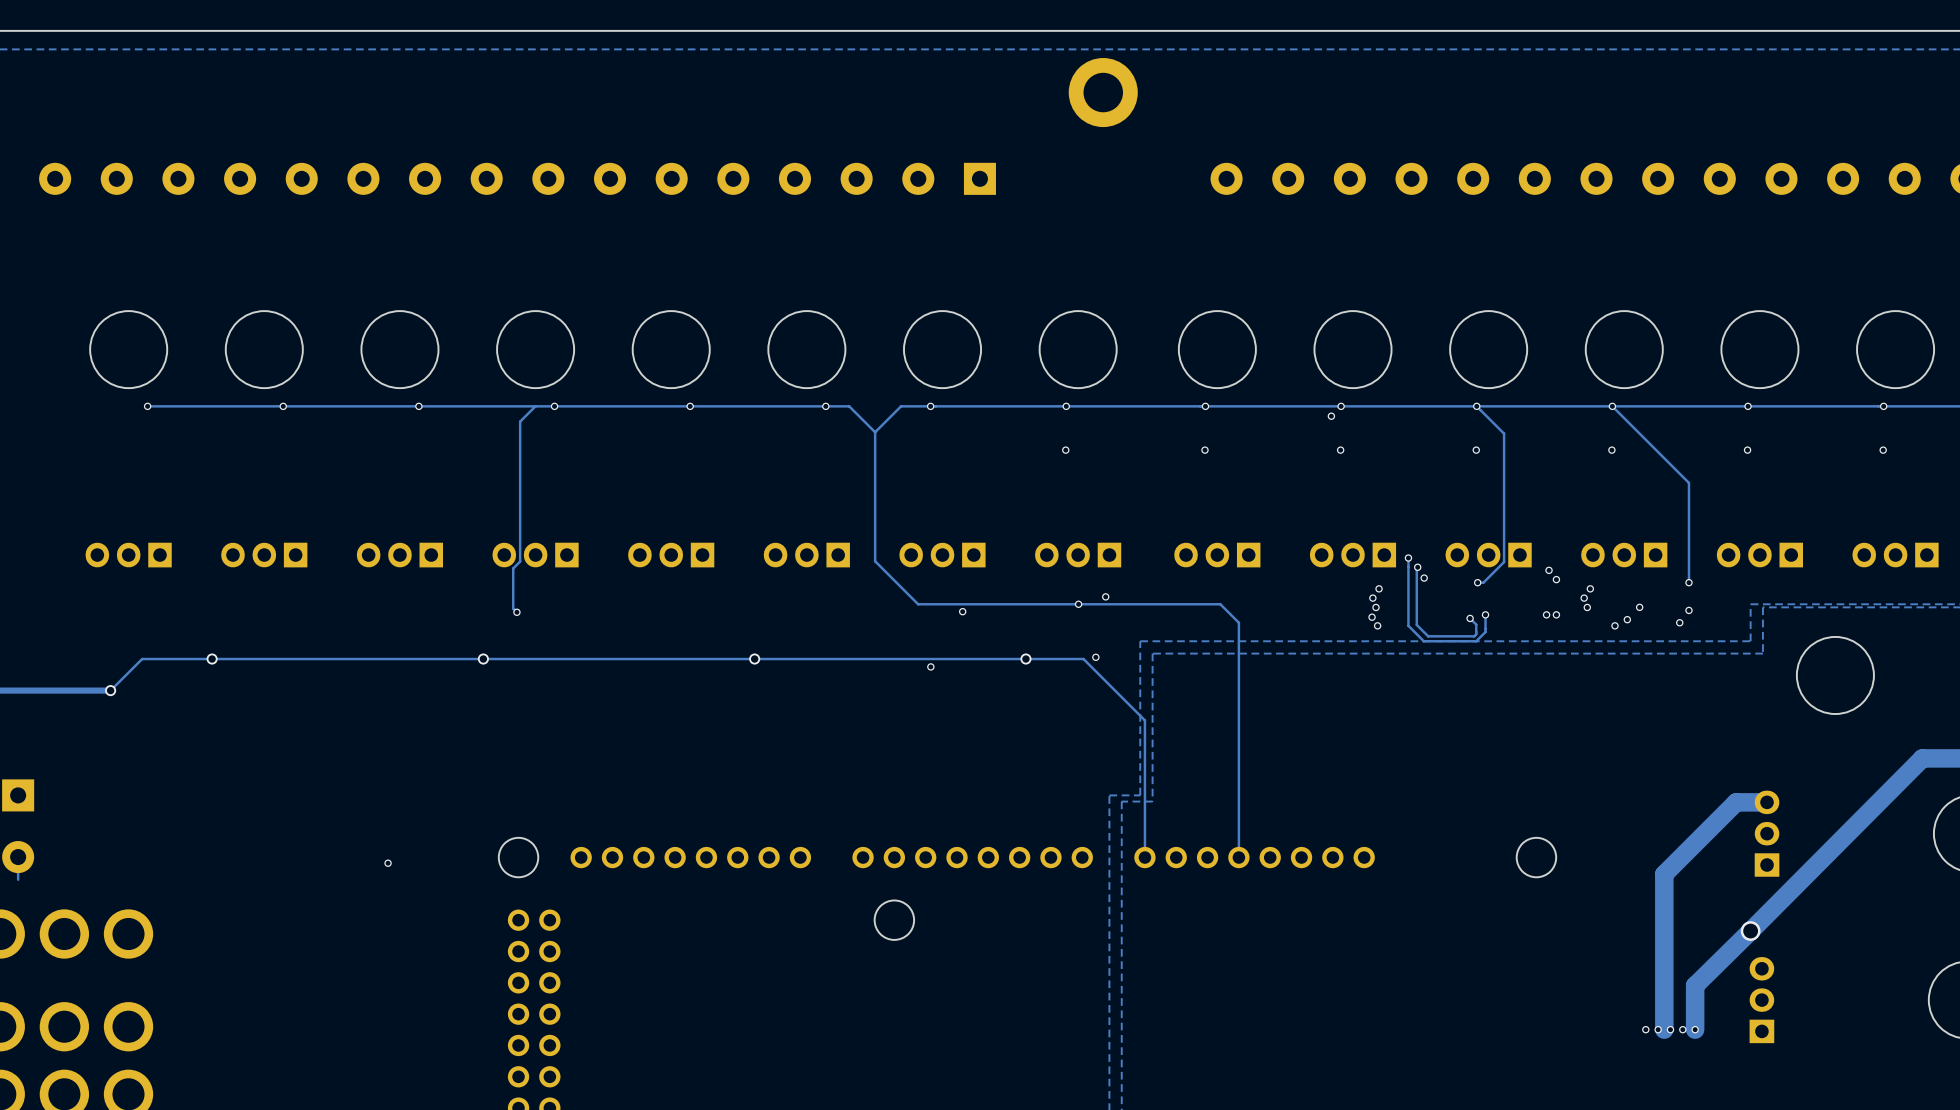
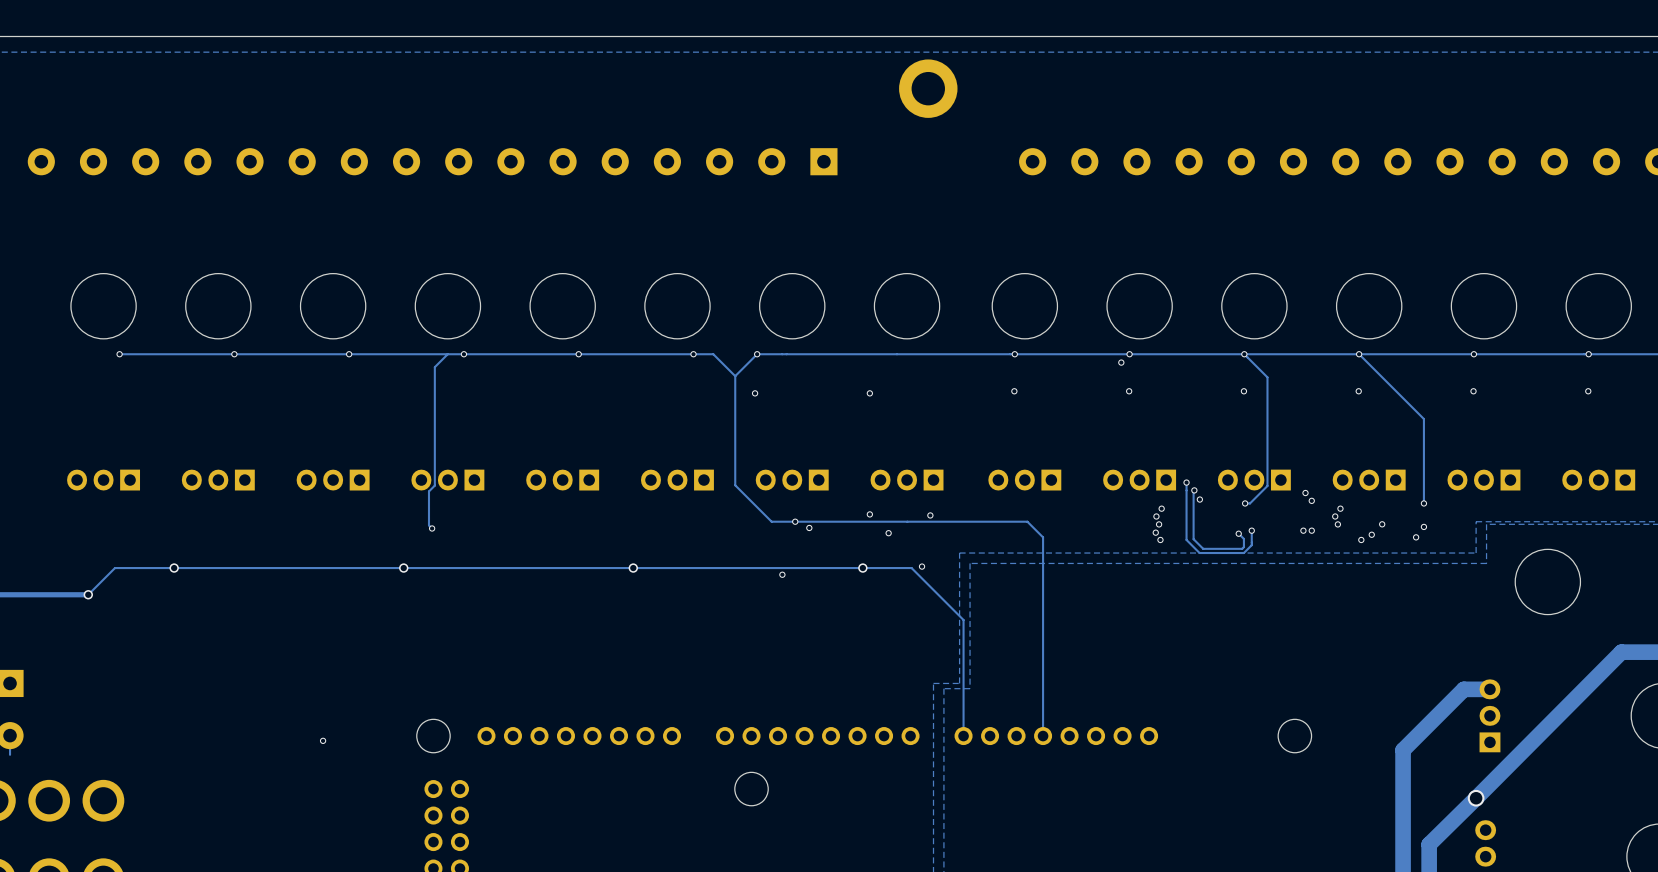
via: none -> (757, 354)
via: (930, 406) -> none
via: (1066, 406) -> none
via: (1065, 450) -> none
via: none -> (755, 393)
via: none -> (869, 393)
via: none -> (869, 514)
via: none -> (795, 521)
via: (1078, 604) -> none
via: none -> (888, 533)

